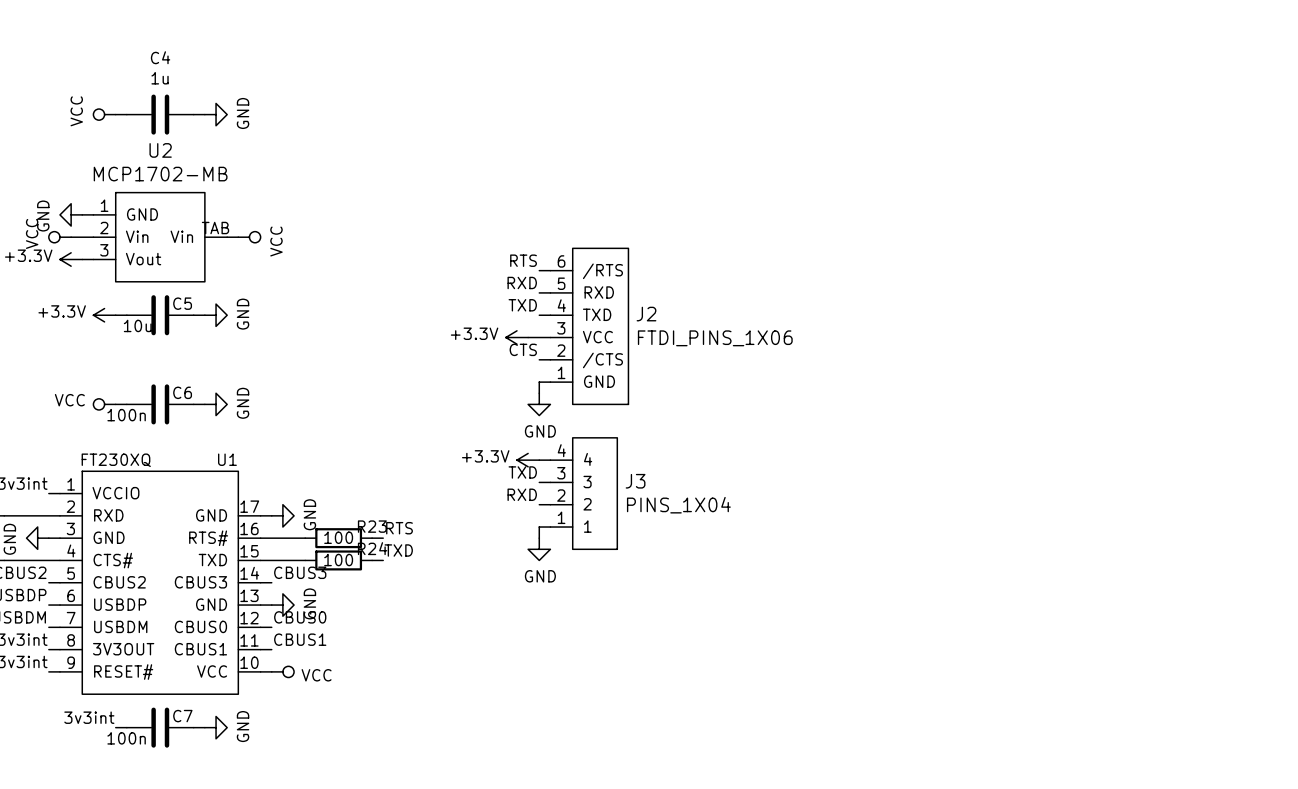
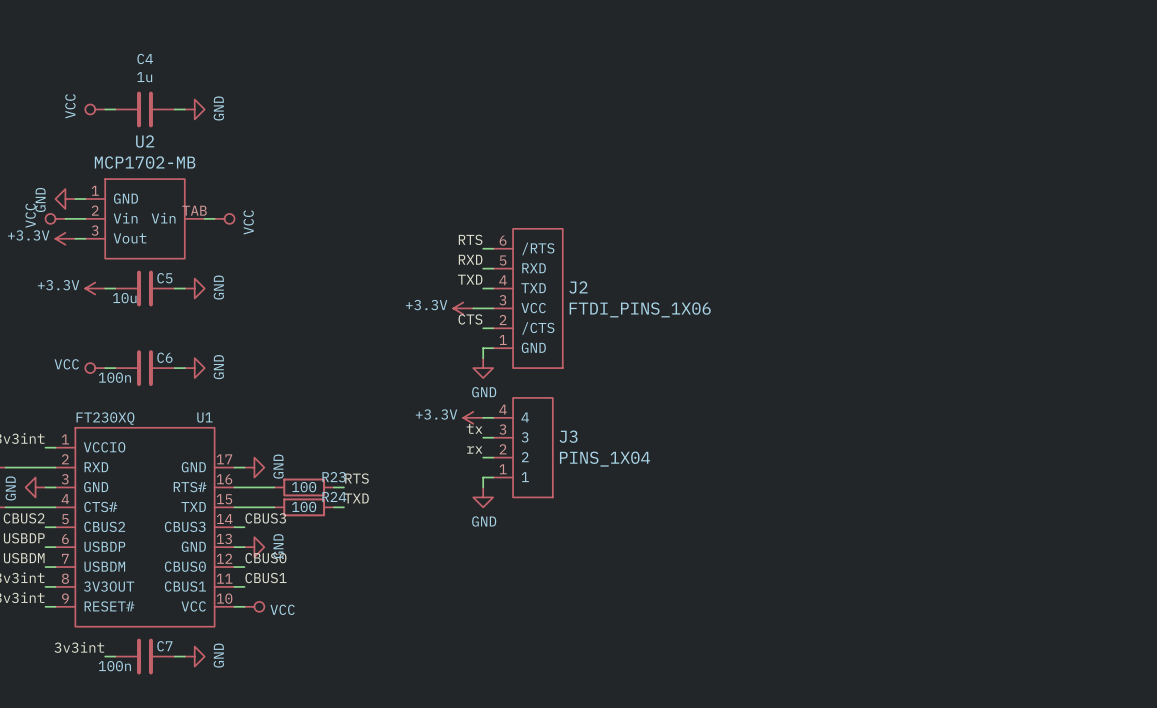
label: TXD (522, 472) -> tx (474, 428)
label: RXD (522, 494) -> rx (474, 450)

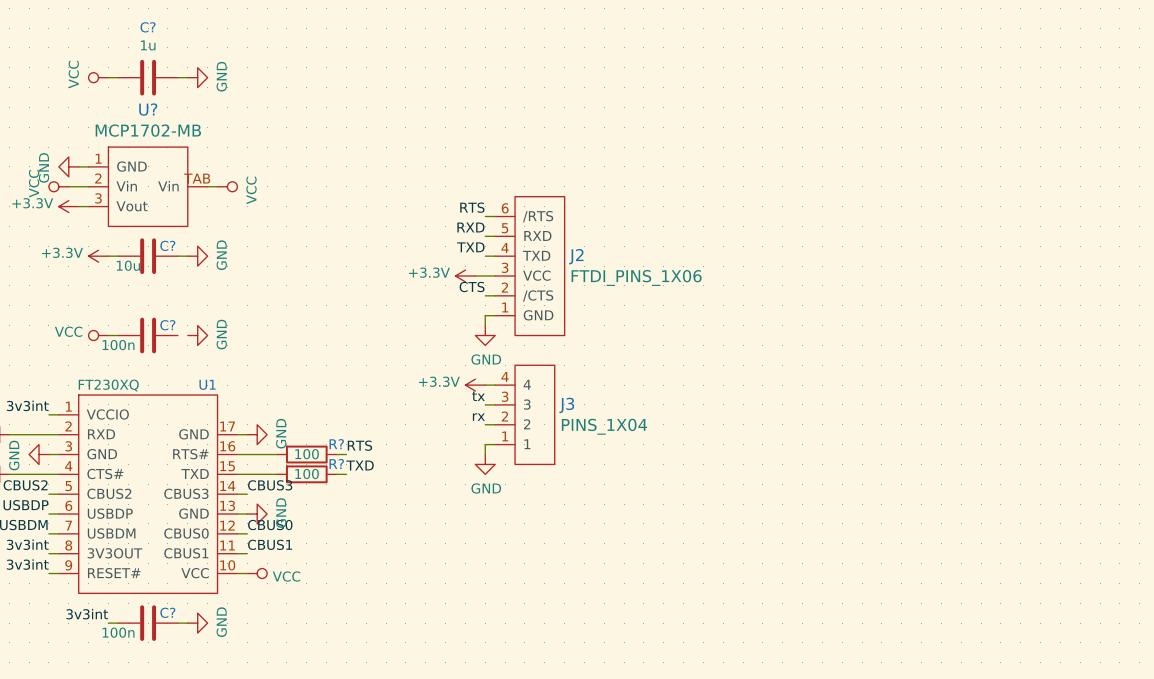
C4 name: C4 (145, 58) -> C? (148, 27)
U2 name: U2 (145, 141) -> U? (148, 109)
C5 name: C5 (164, 278) -> C? (167, 245)
C6 name: C6 (164, 357) -> C? (167, 325)
wire: (174, 368) (184, 368) -> none
R23 name: R23 (334, 477) -> R? (336, 444)
R24 name: R24 (334, 496) -> R? (336, 463)
C7 name: C7 (164, 646) -> C? (167, 612)

